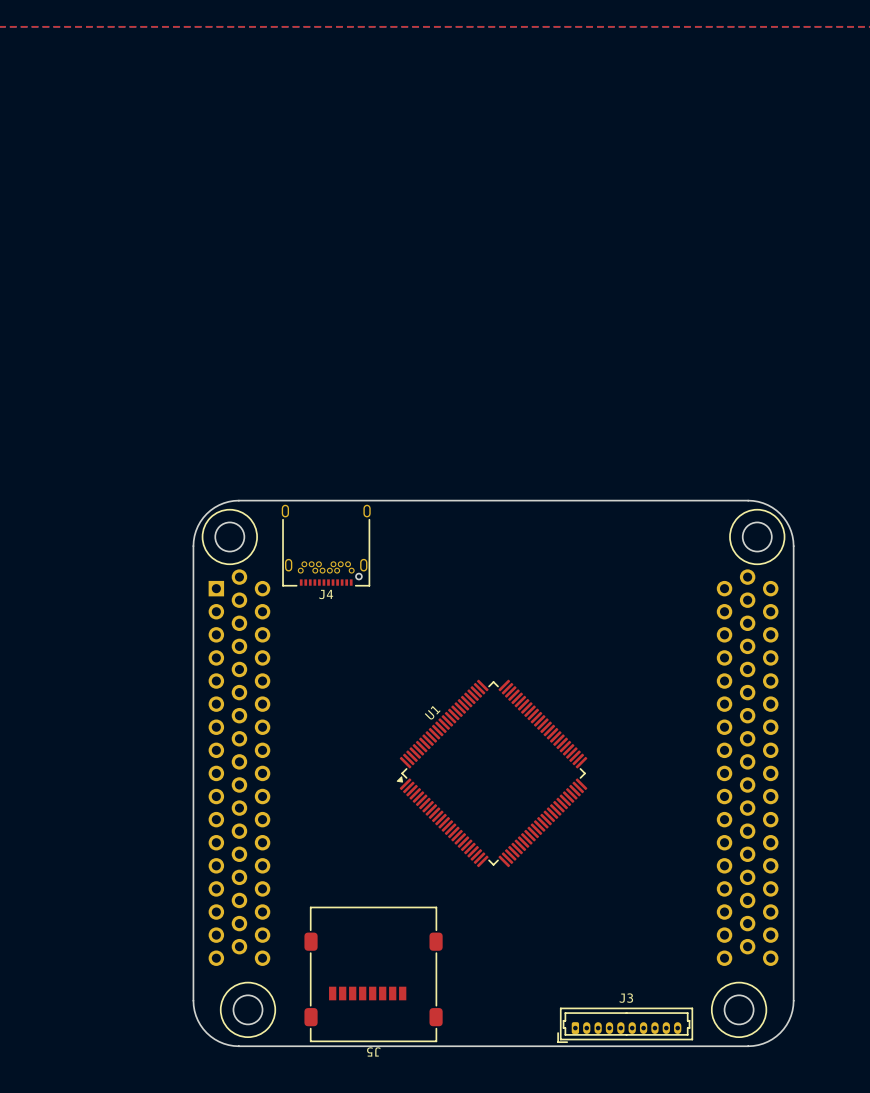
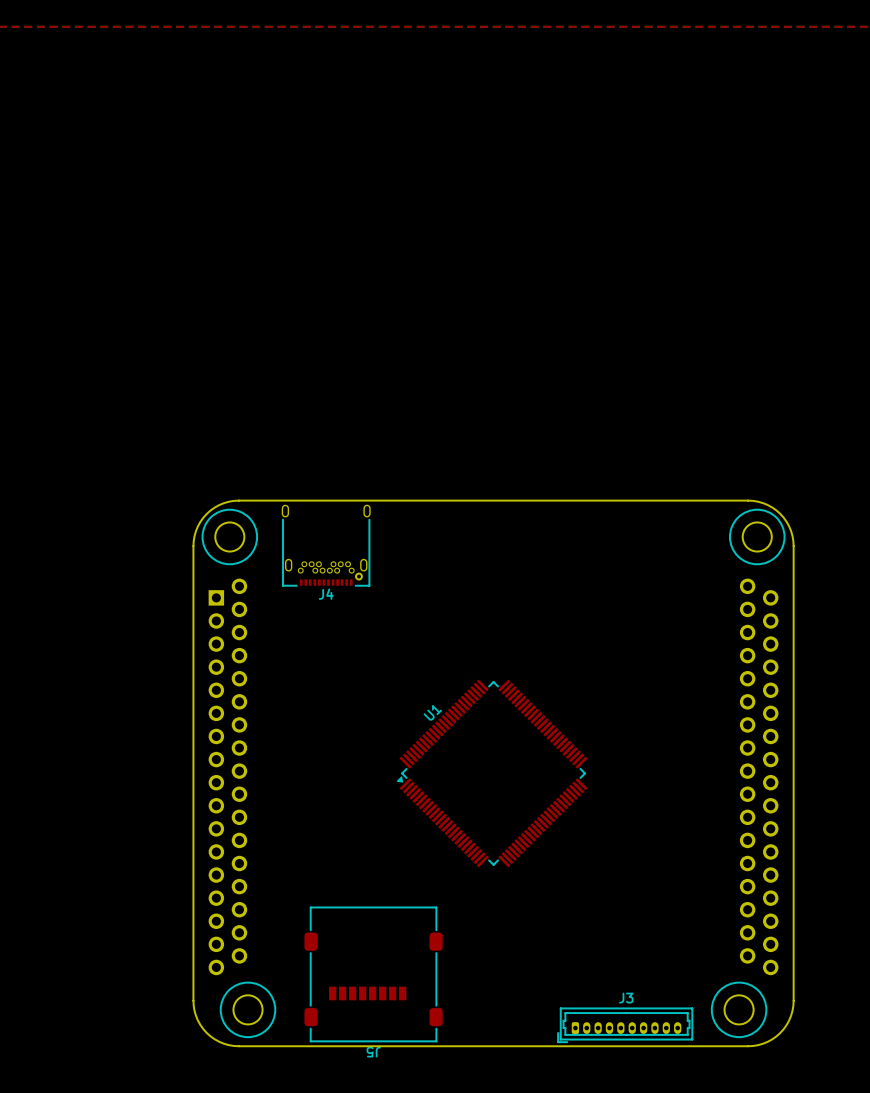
part footprint: [193, 500, 794, 1047] -> [193, 500, 794, 1047]

